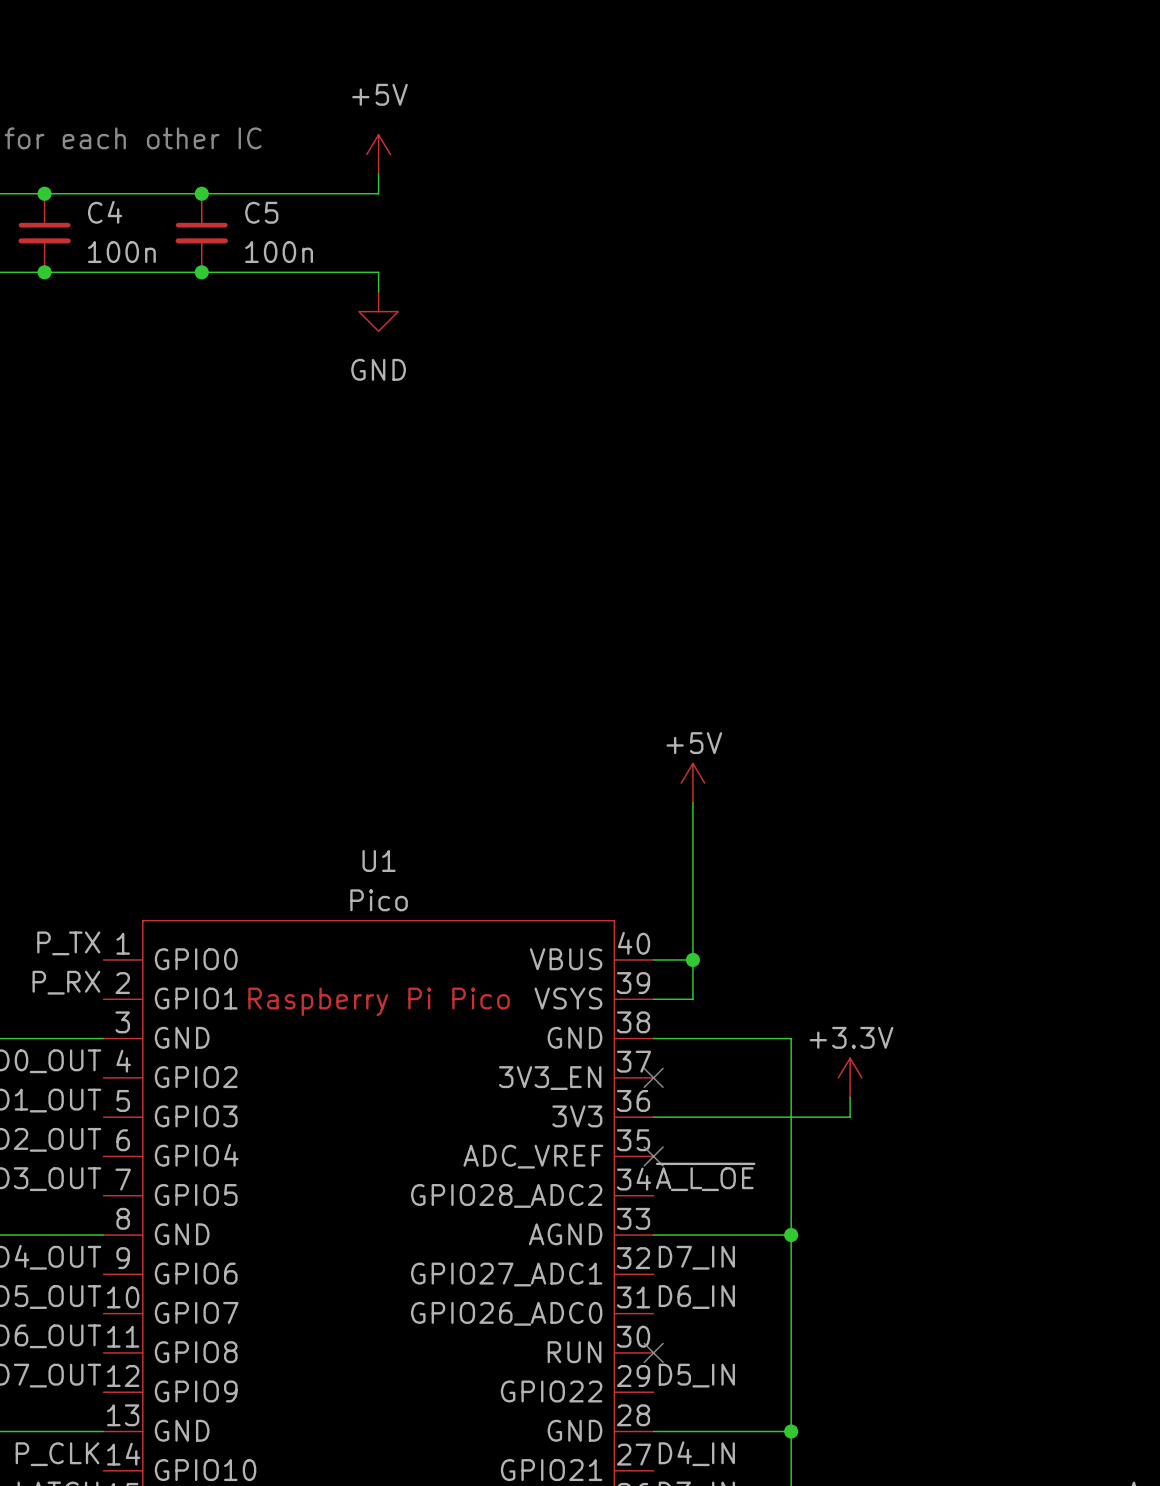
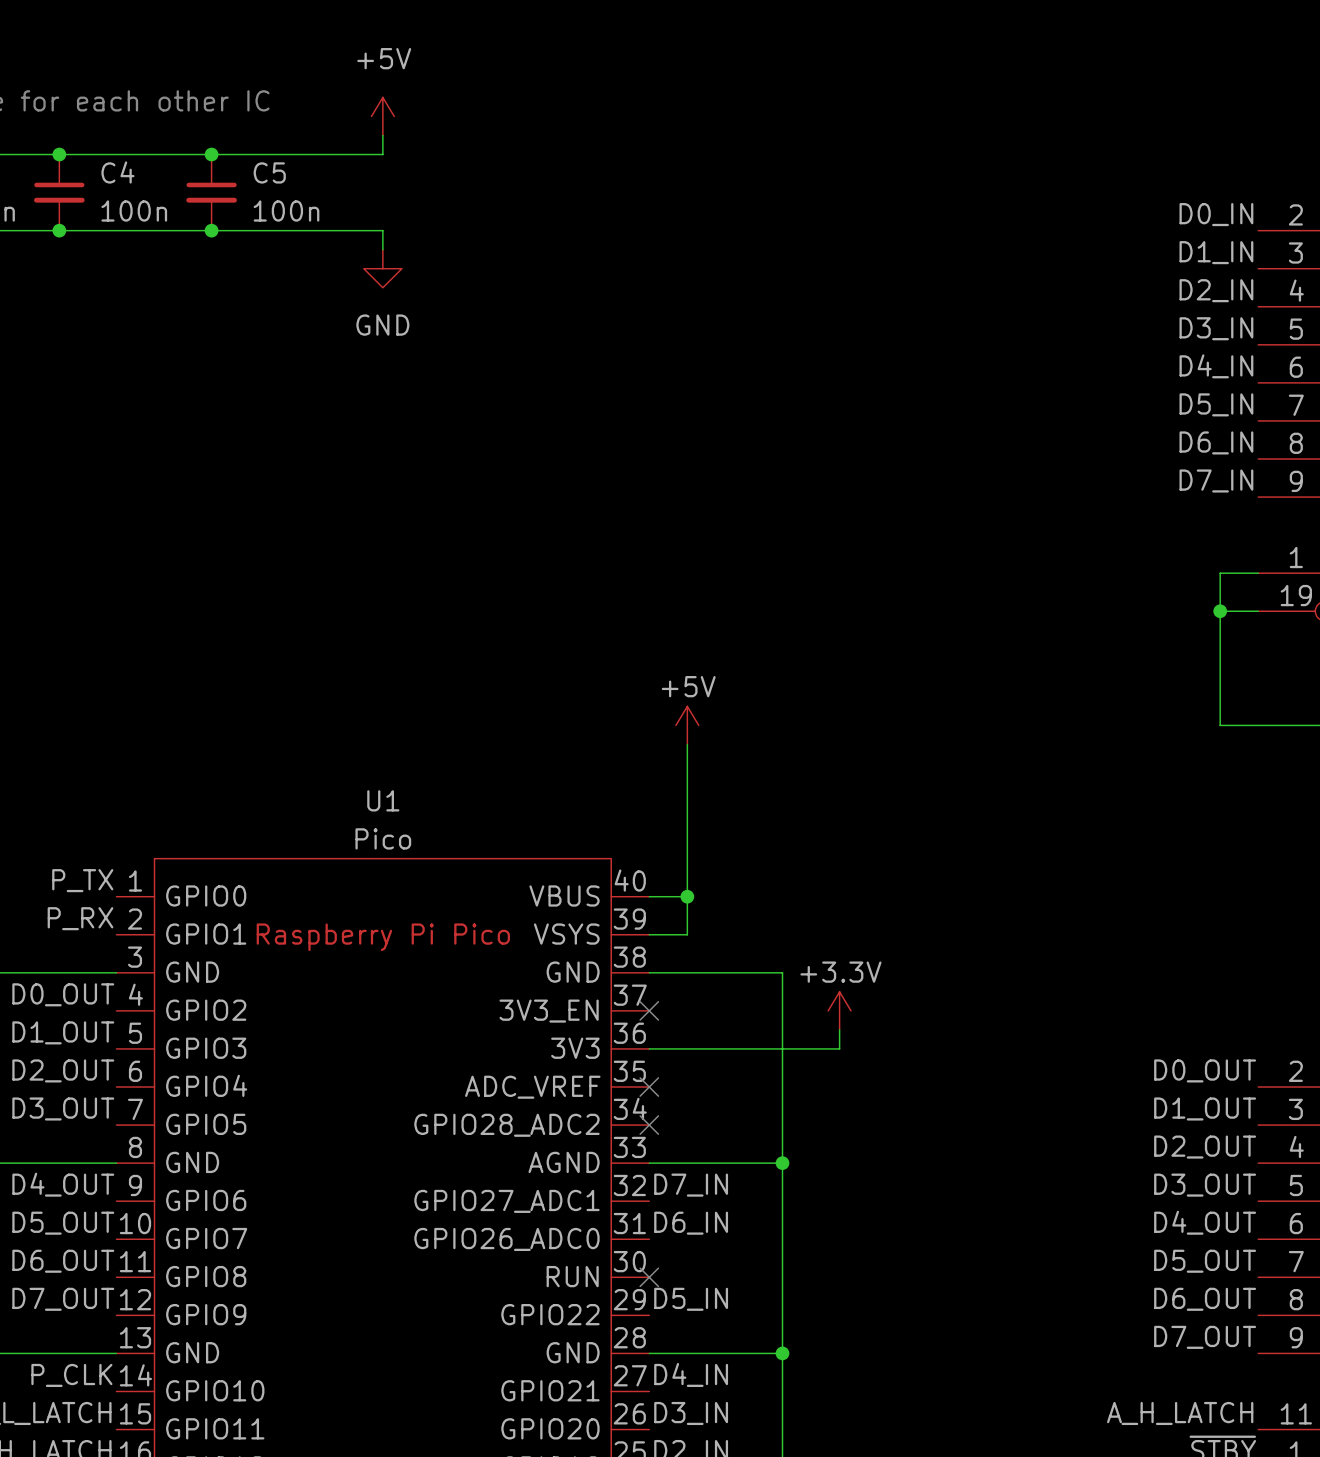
label: ~{A_L_OE} (705, 1176) -> none
no-connect mark: none -> (649, 1125)

